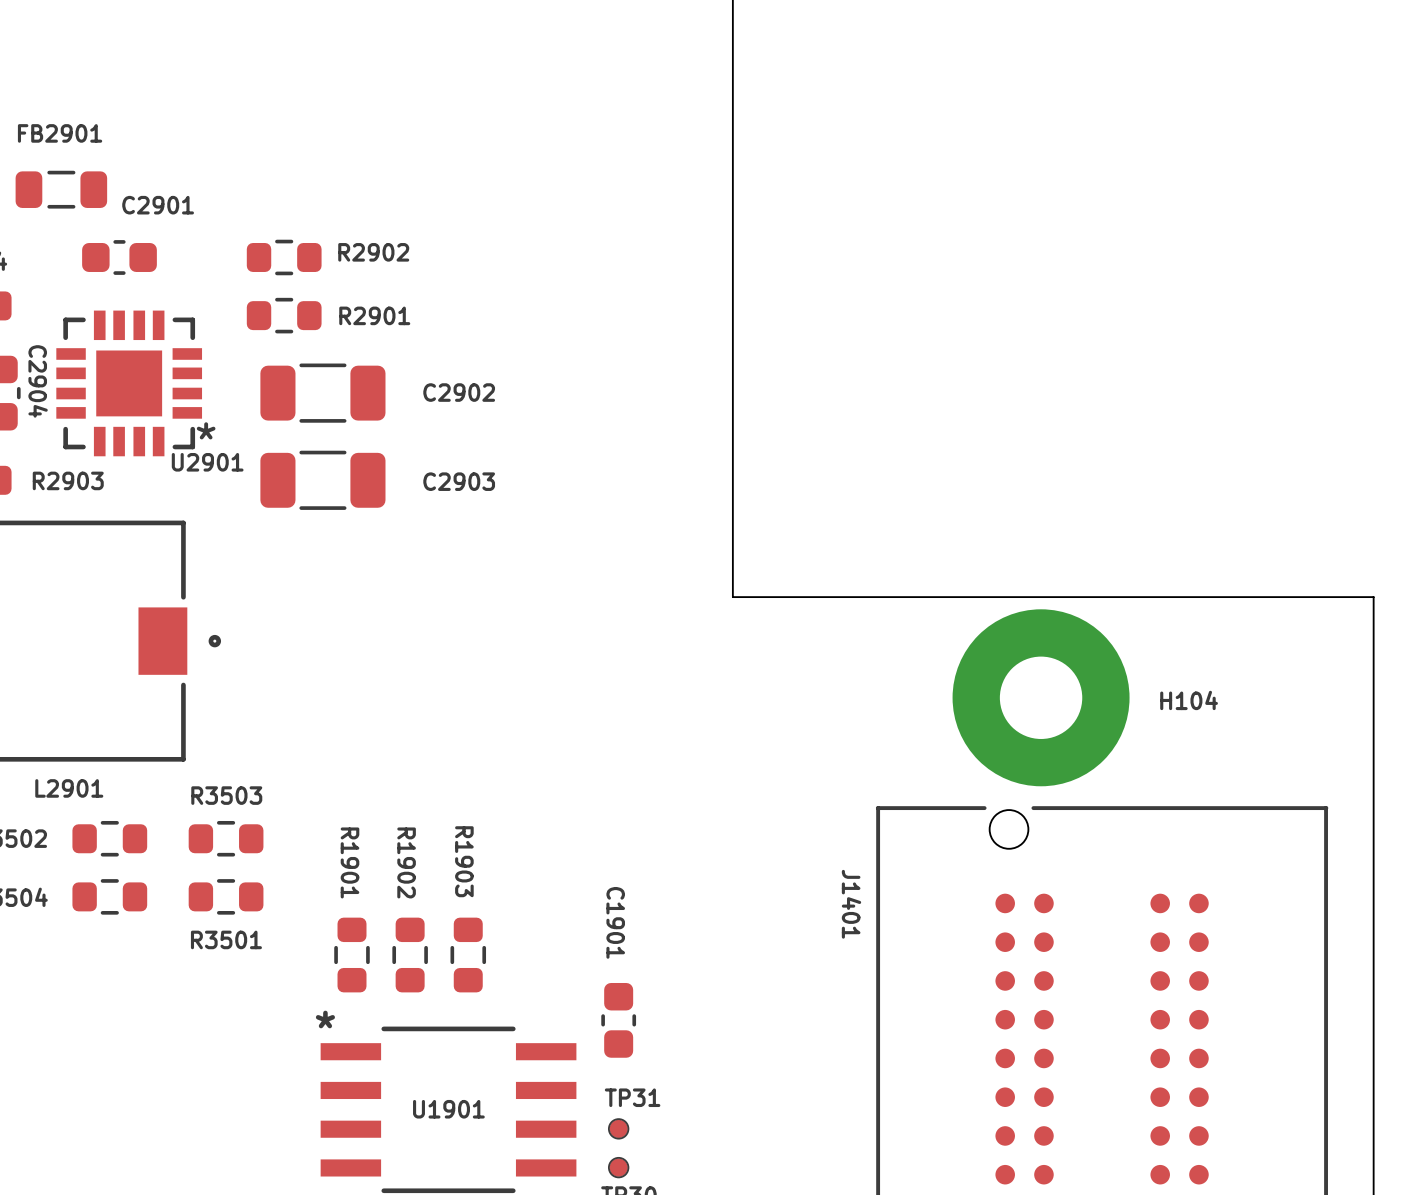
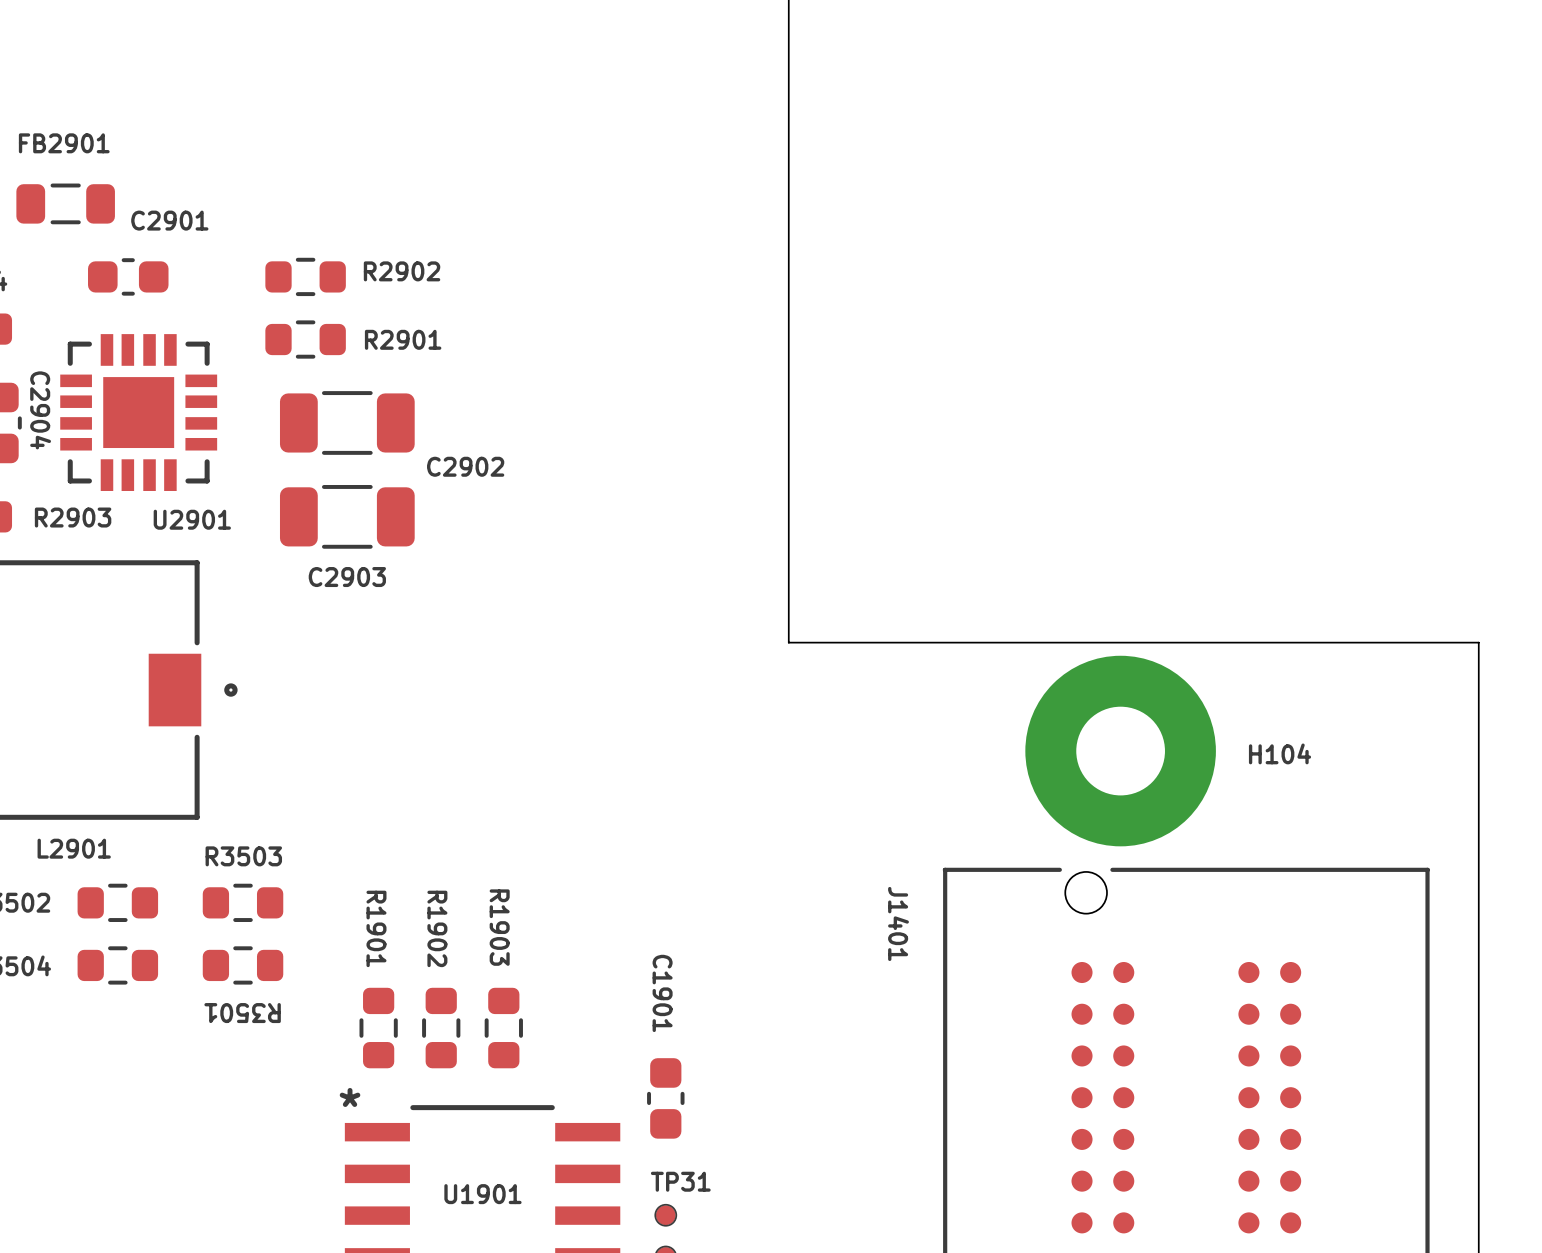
C2902 name position: C2902 (459, 392) -> C2902 (465, 466)
text: * (206, 430) -> none
U2901 name position: U2901 (207, 462) -> U2901 (192, 519)
C2903 name position: C2903 (459, 481) -> C2903 (347, 577)
J1401 name position: J1401 (851, 904) -> J1401 (898, 923)
R3501 name rotation: 0° (226, 939) -> 180° (242, 1013)

